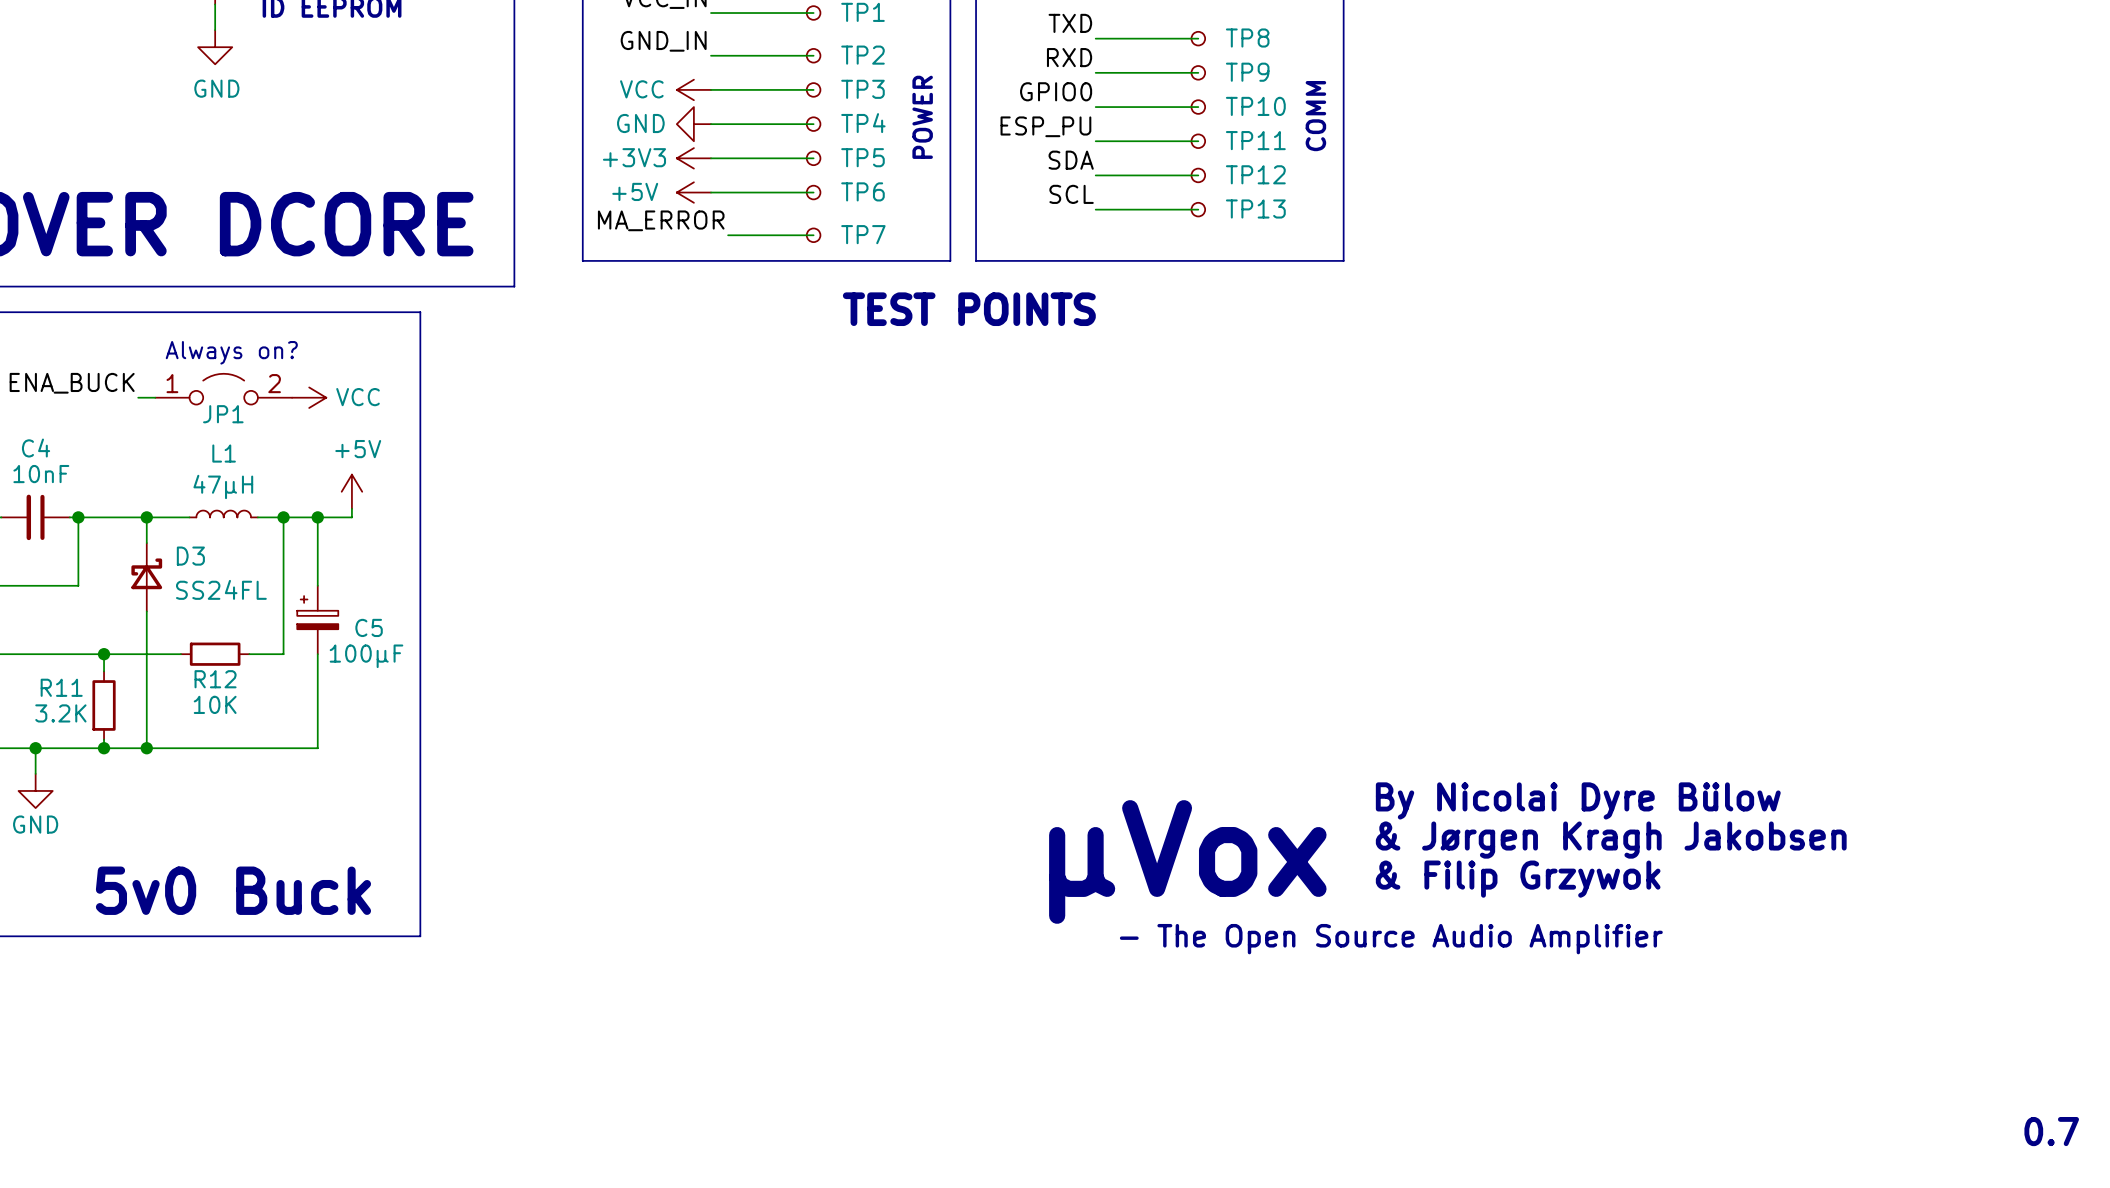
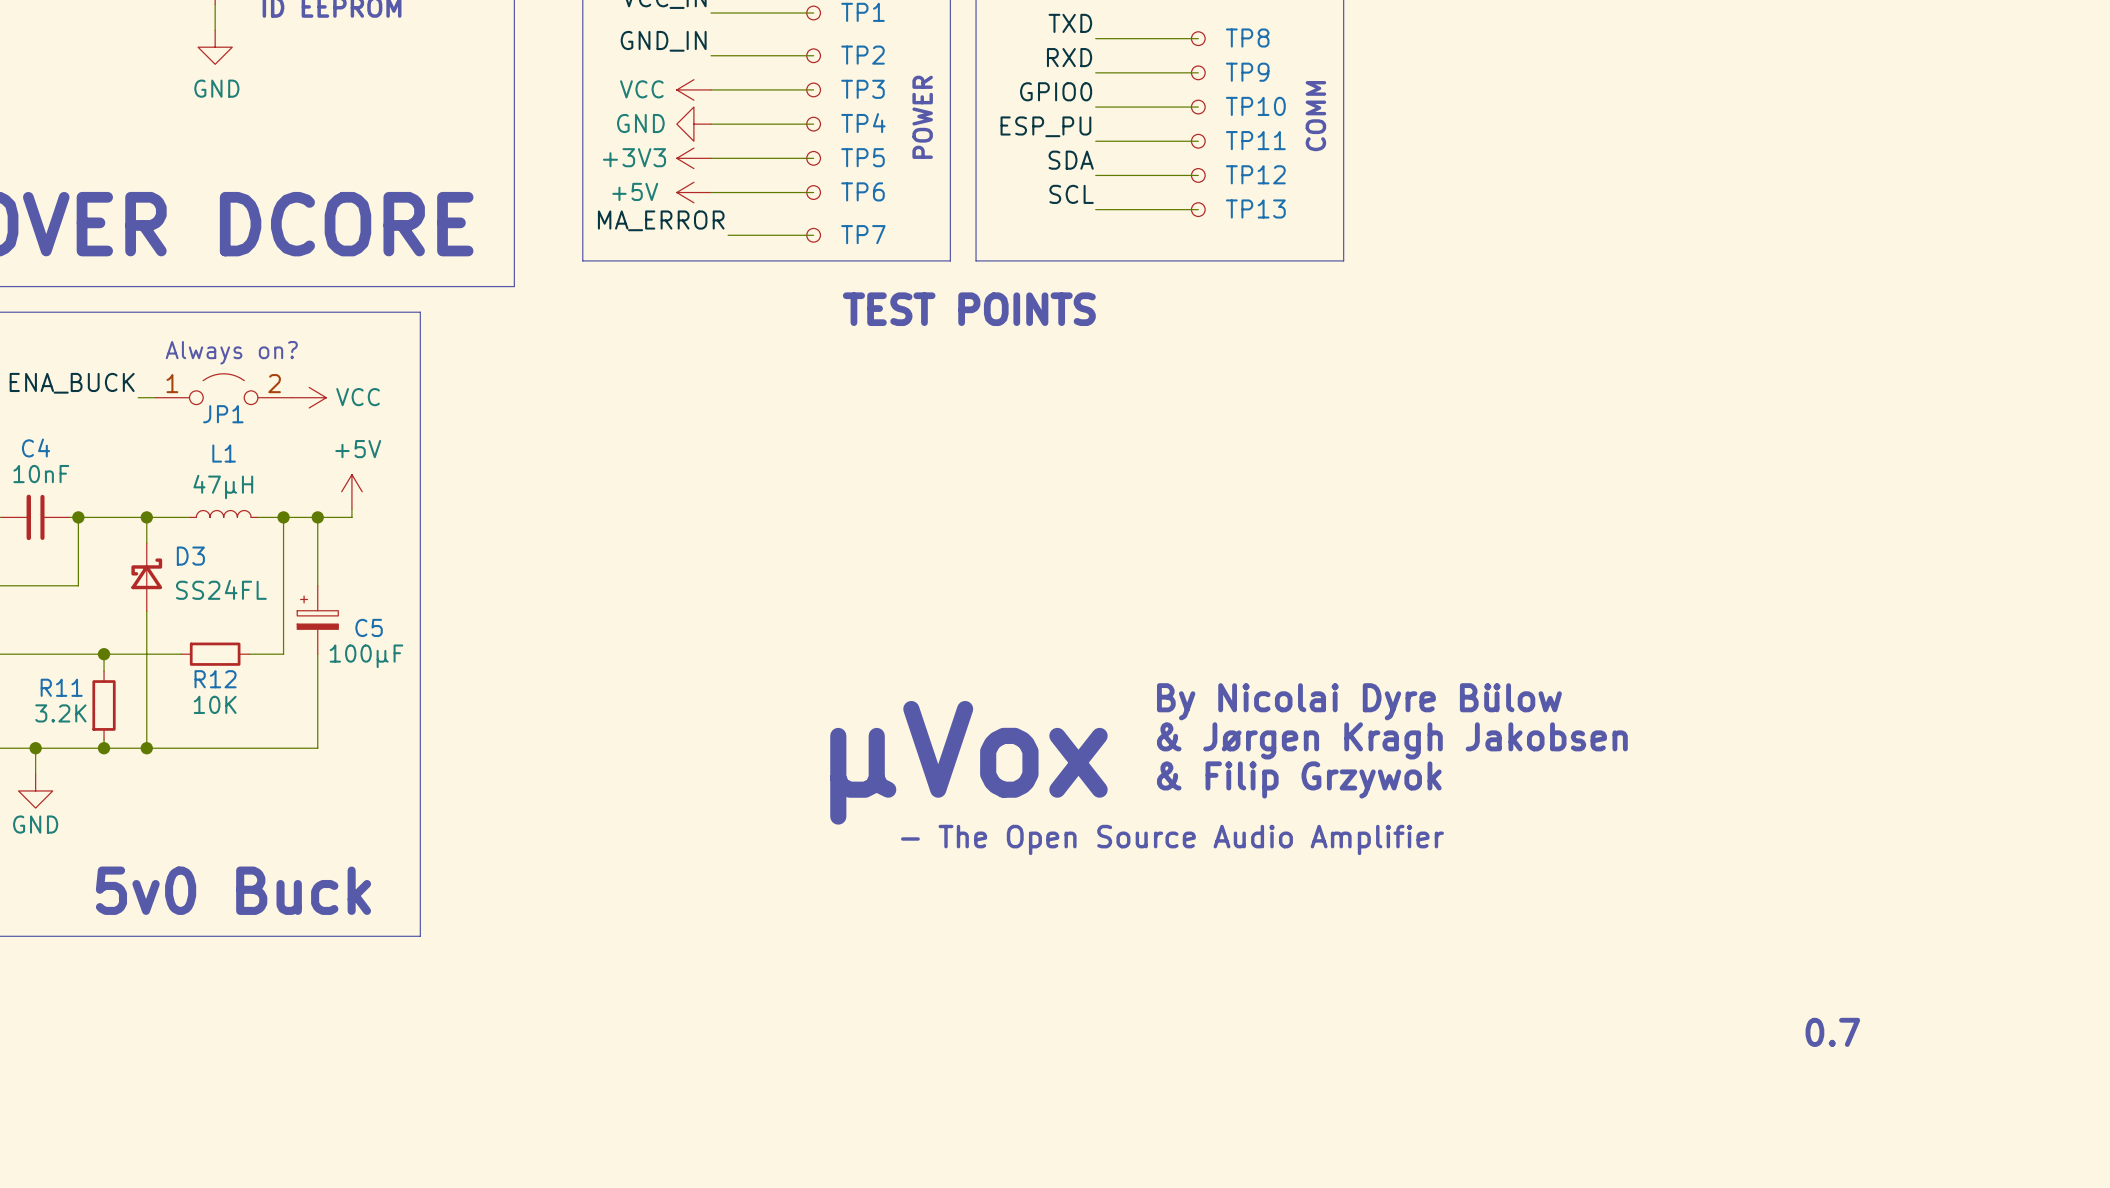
text position: By Nicolai Dyre Bülow (1578, 800) -> By Nicolai Dyre Bülow (1359, 701)
text position: & Jørgen Kragh Jakobsen (1611, 840) -> & Jørgen Kragh Jakobsen (1392, 740)
text position: µVox (1187, 861) -> µVox (968, 762)
text position: & Filip Grzywok (1518, 879) -> & Filip Grzywok (1299, 779)
text position: - The Open Source Audio Amplifier (1391, 939) -> - The Open Source Audio Amplifier (1172, 839)
text position: 0.7 (2051, 1131) -> 0.7 (1832, 1032)

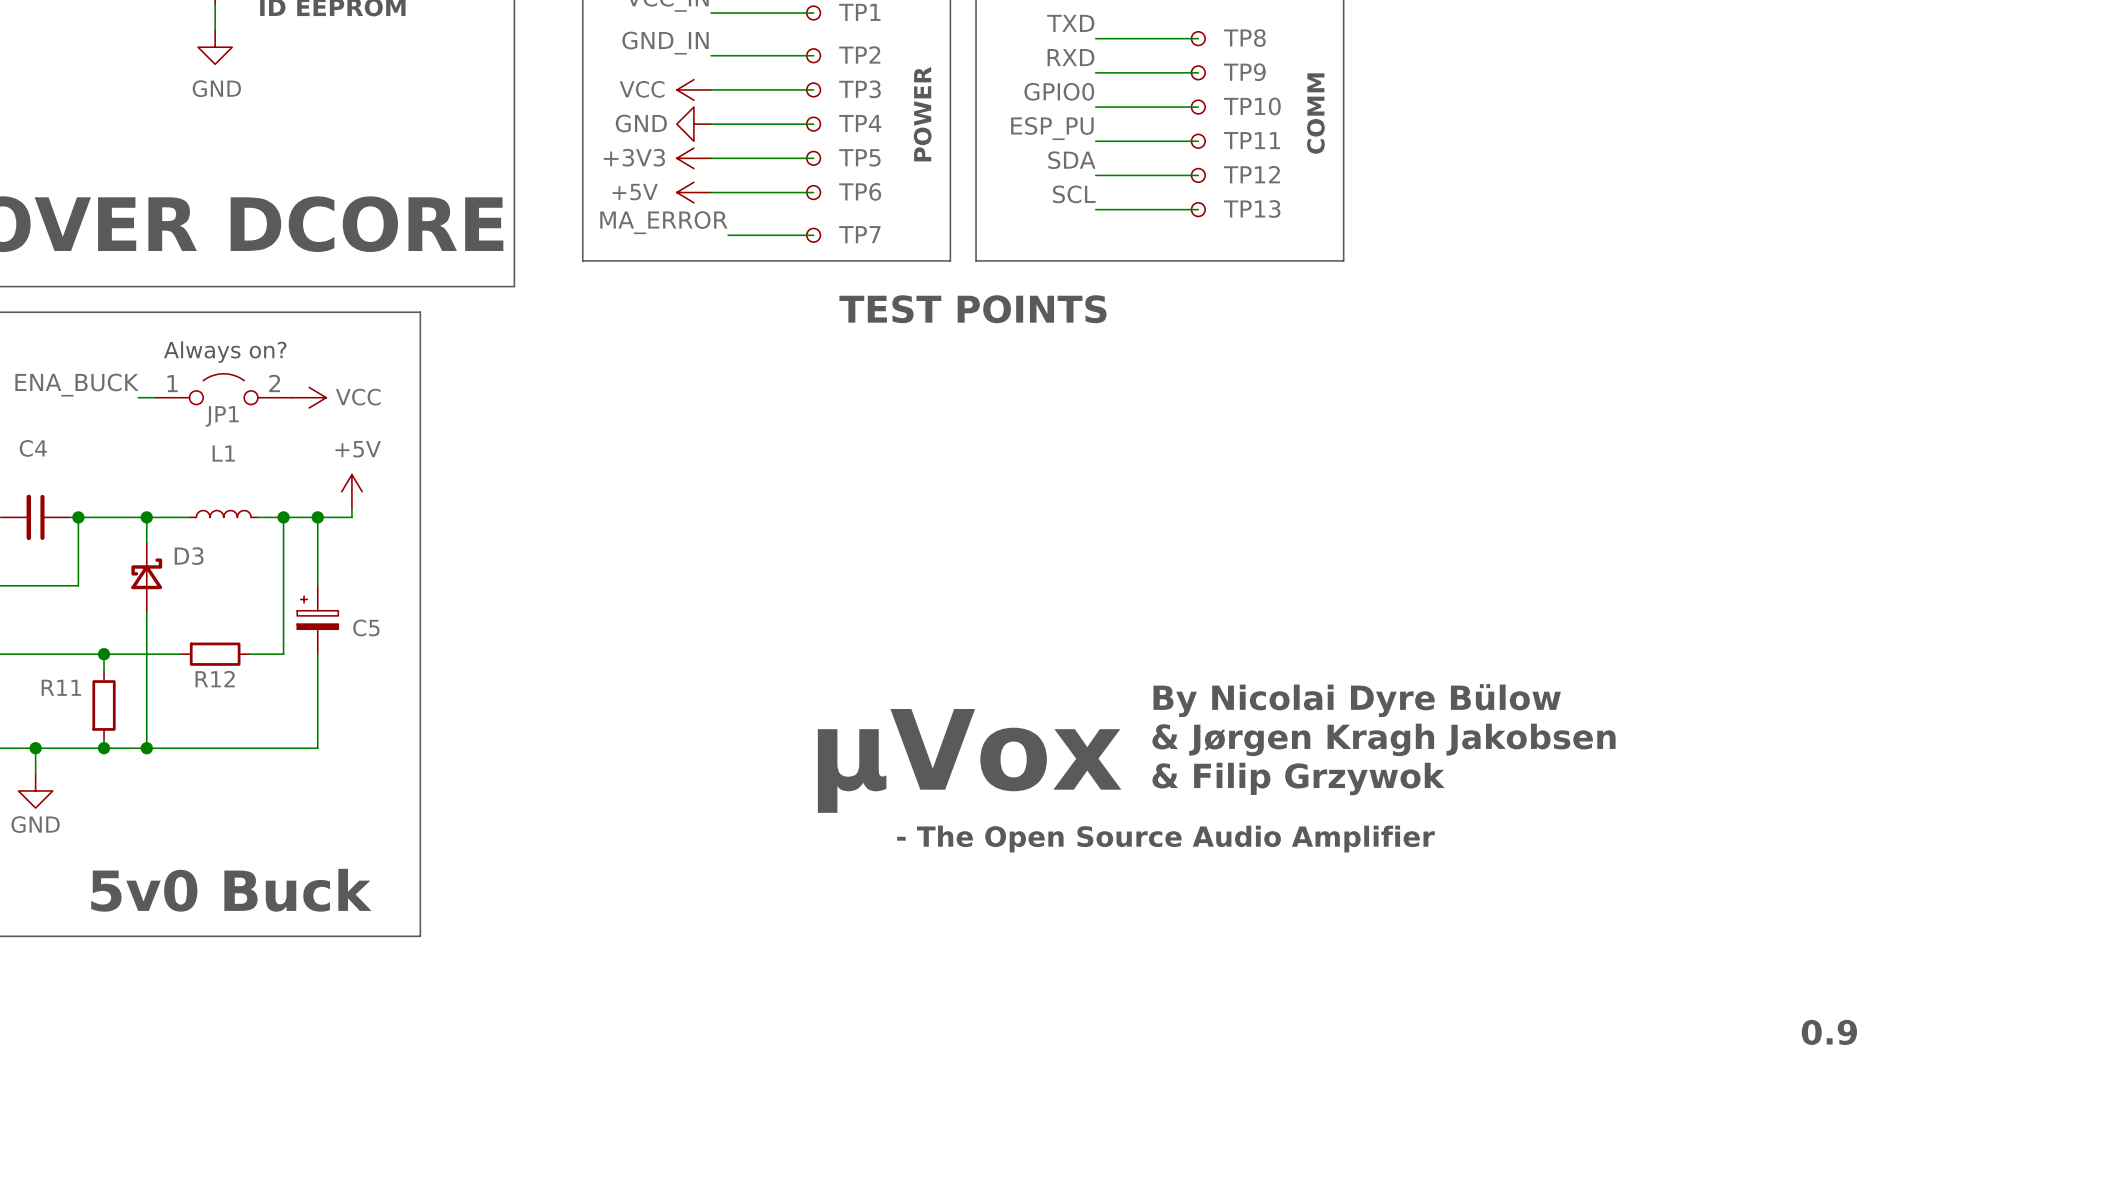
C4 value: 10nF (41, 474) -> none
L1 value: 47µH (223, 486) -> none
D3 value: SS24FL (221, 589) -> none
C5 value: 100µF (366, 656) -> none
R12 value: 10K (215, 704) -> none
R11 value: 3.2K (60, 713) -> none
text: 0.7 (1832, 1032) -> 0.9 (1829, 1032)

